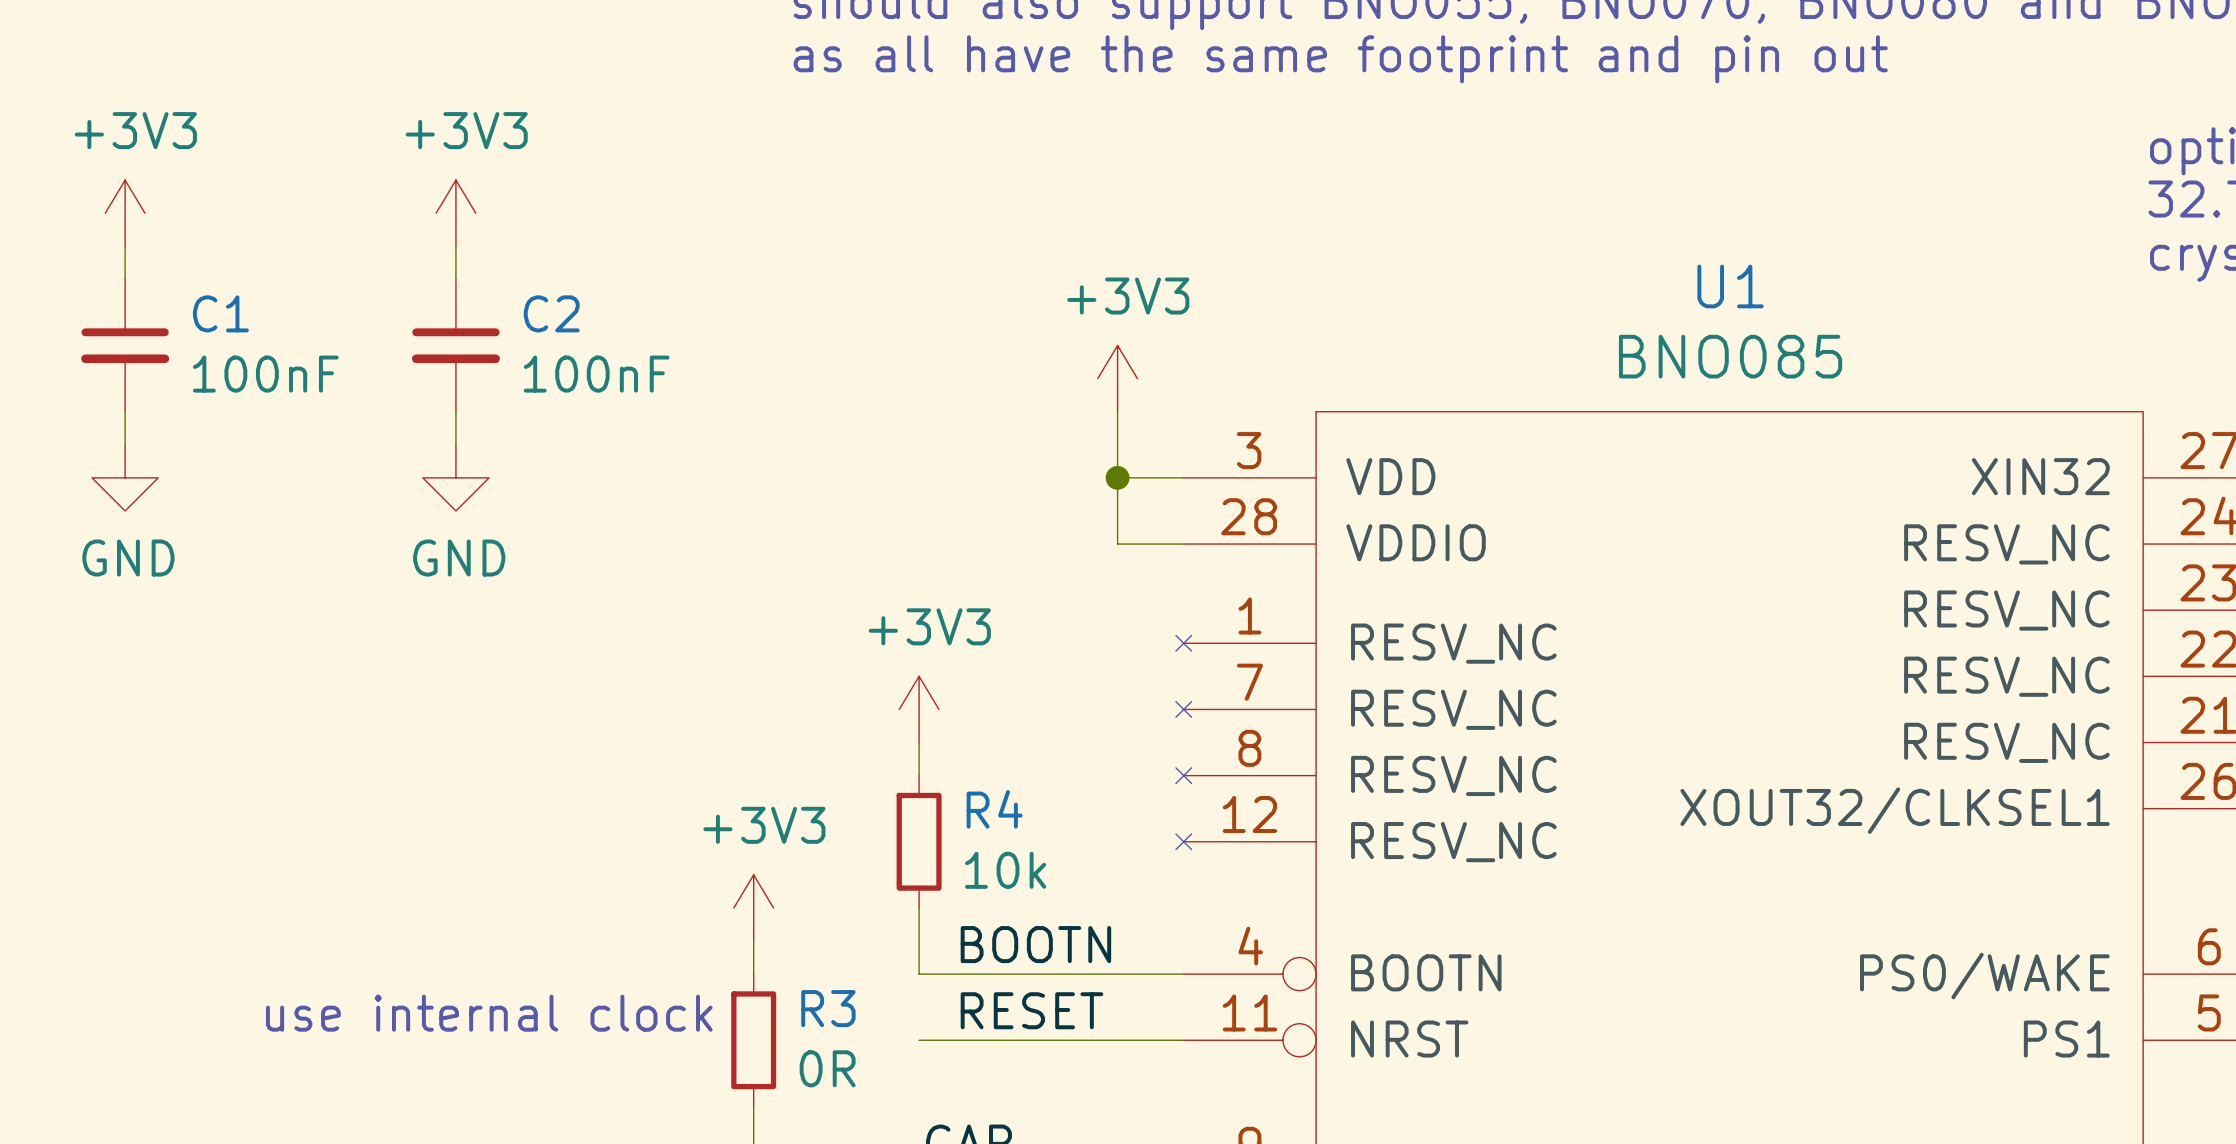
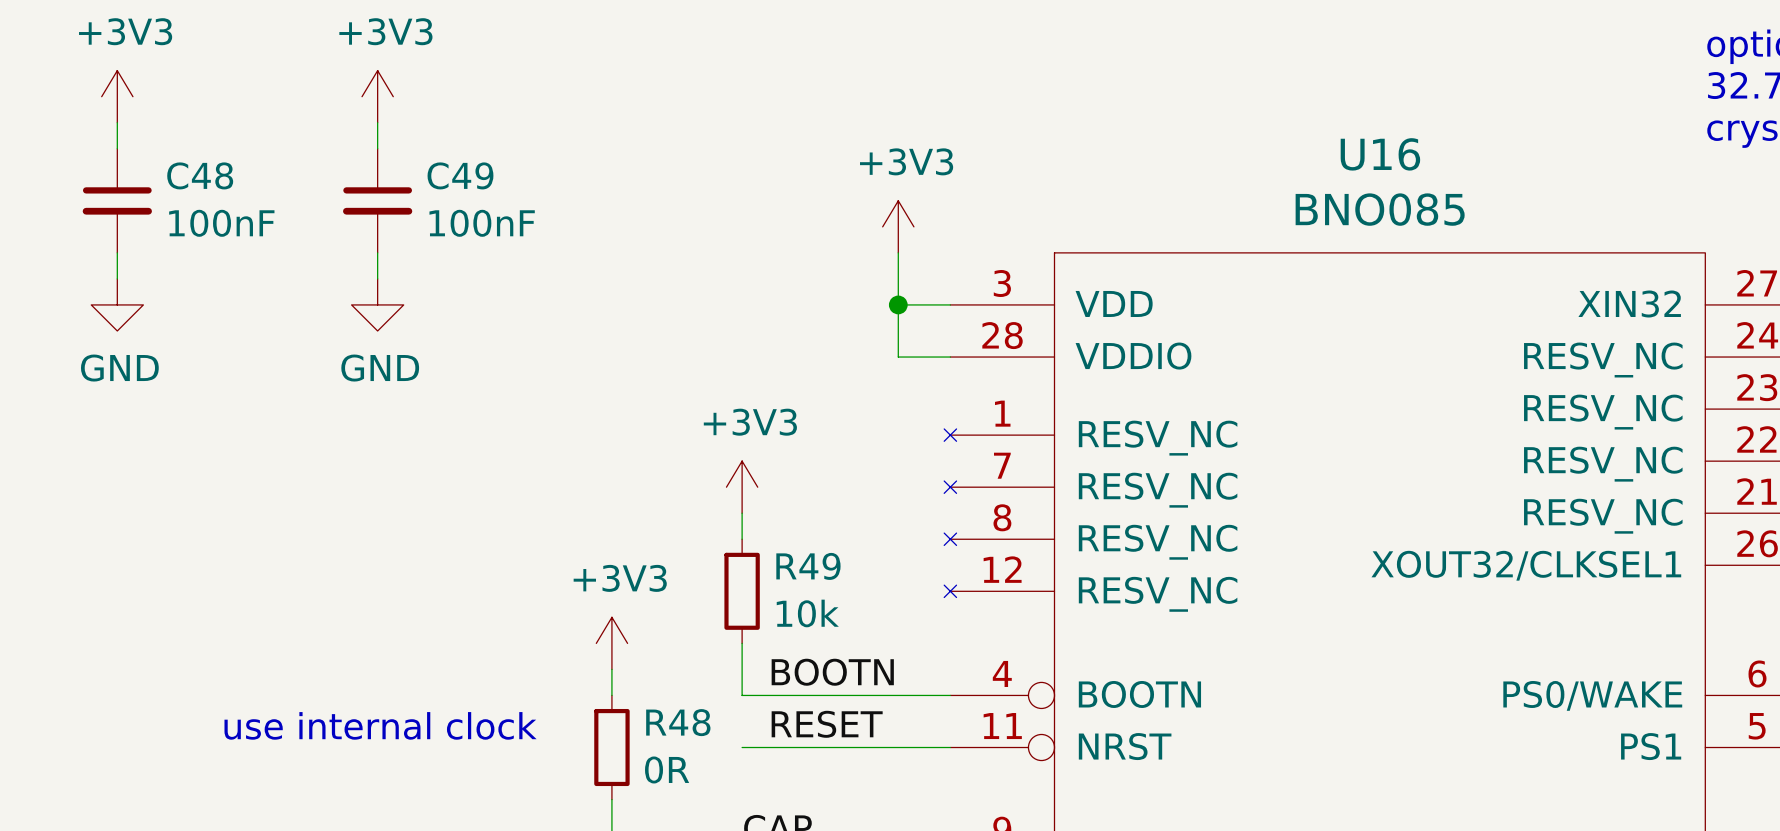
U1 name: U1 (1730, 286) -> U16 (1380, 154)
C1 name: C1 (220, 313) -> C48 (200, 175)
C2 name: C2 (551, 313) -> C49 (460, 175)
R4 name: R4 (994, 809) -> R49 (808, 566)
R3 name: R3 (828, 1008) -> R48 (678, 722)

